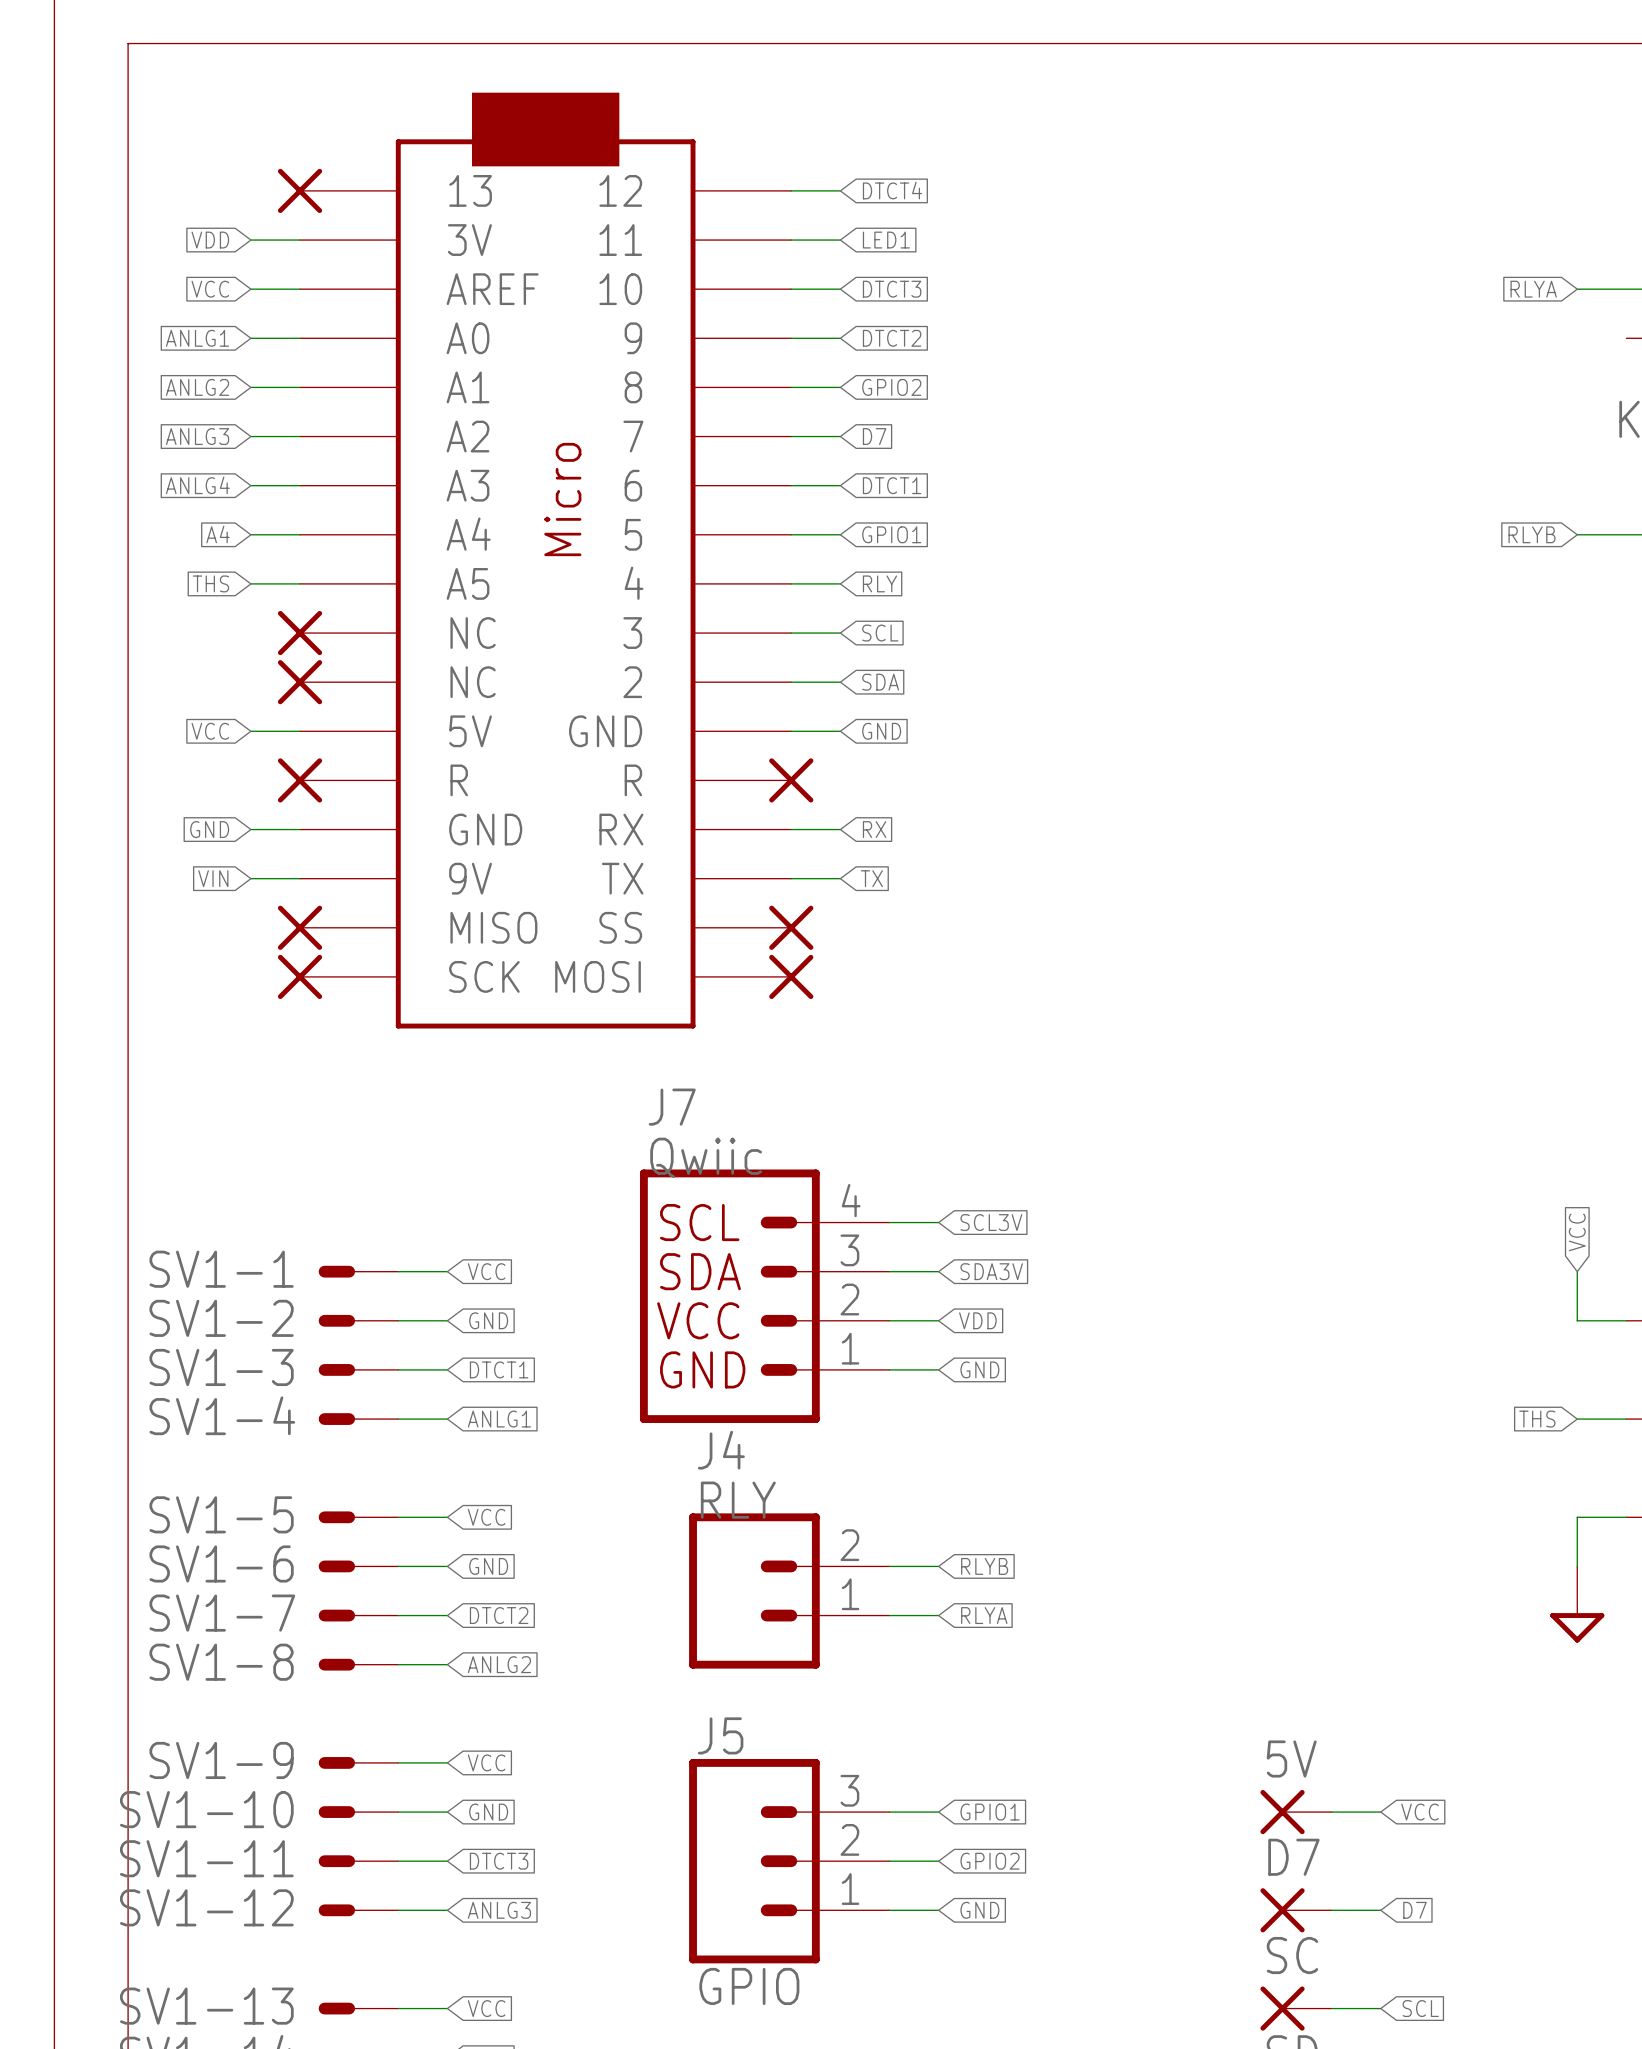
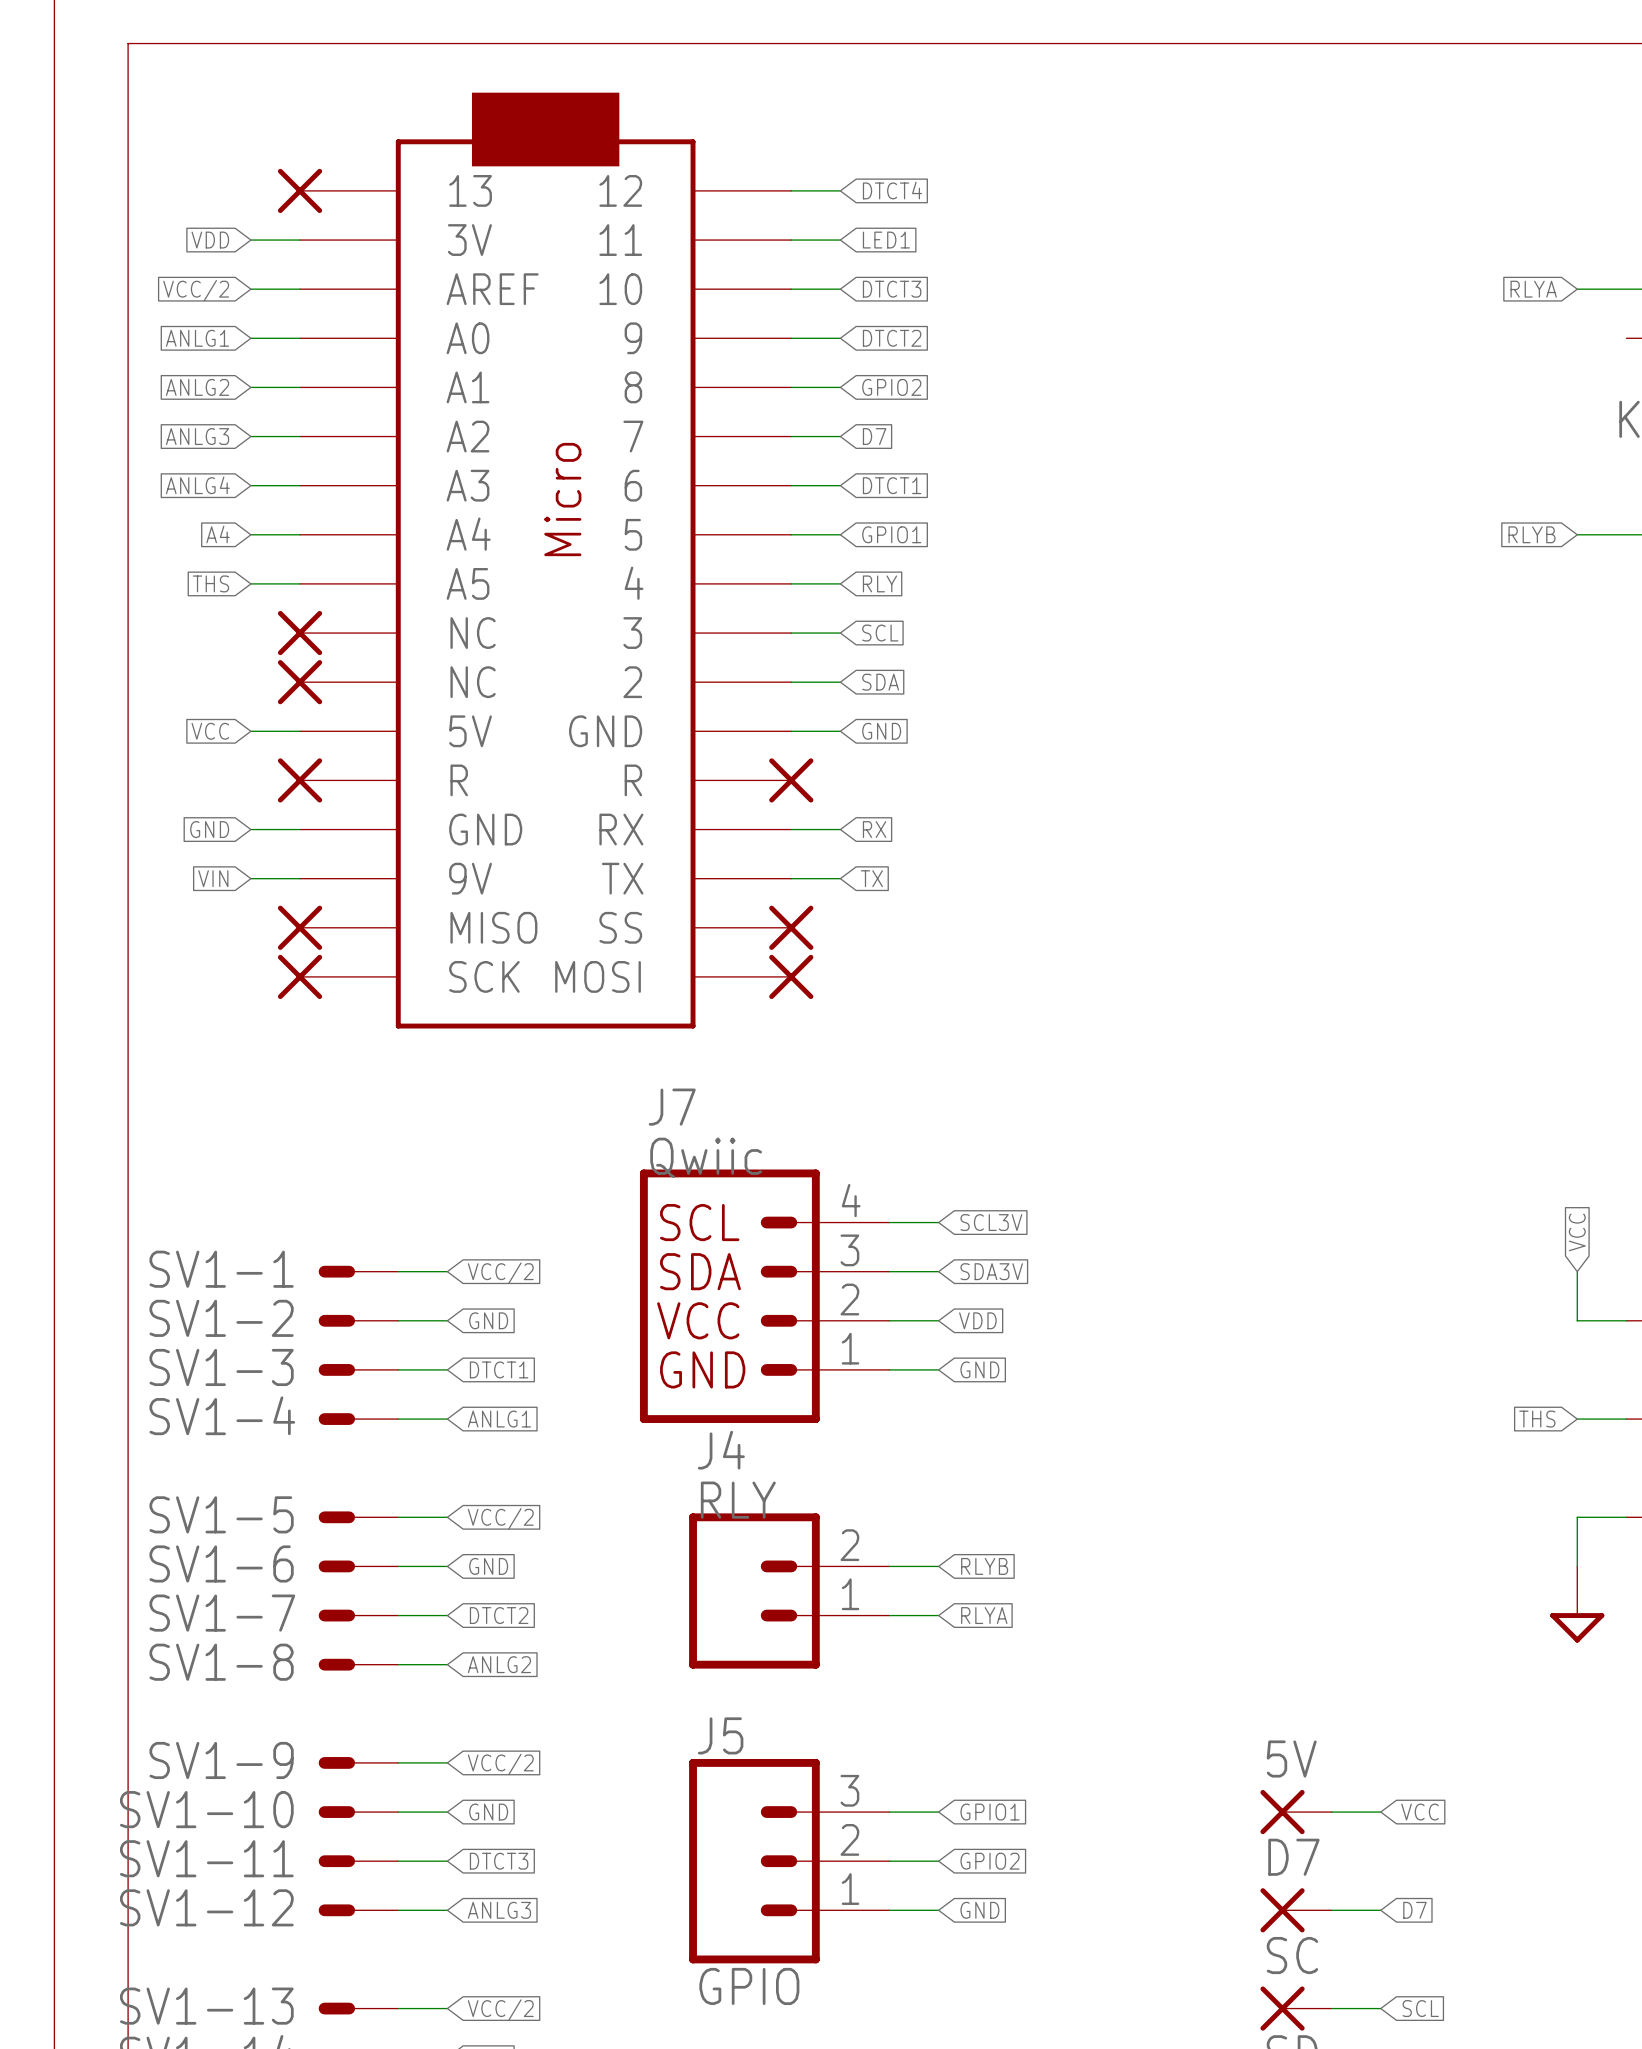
global label: VCC (210, 289) -> VCC/2 (196, 290)
global label: VCC (486, 1271) -> VCC/2 (500, 1273)
global label: VCC (486, 1517) -> VCC/2 (500, 1518)
global label: VCC (486, 1762) -> VCC/2 (500, 1764)
global label: VCC (486, 2008) -> VCC/2 (500, 2010)

